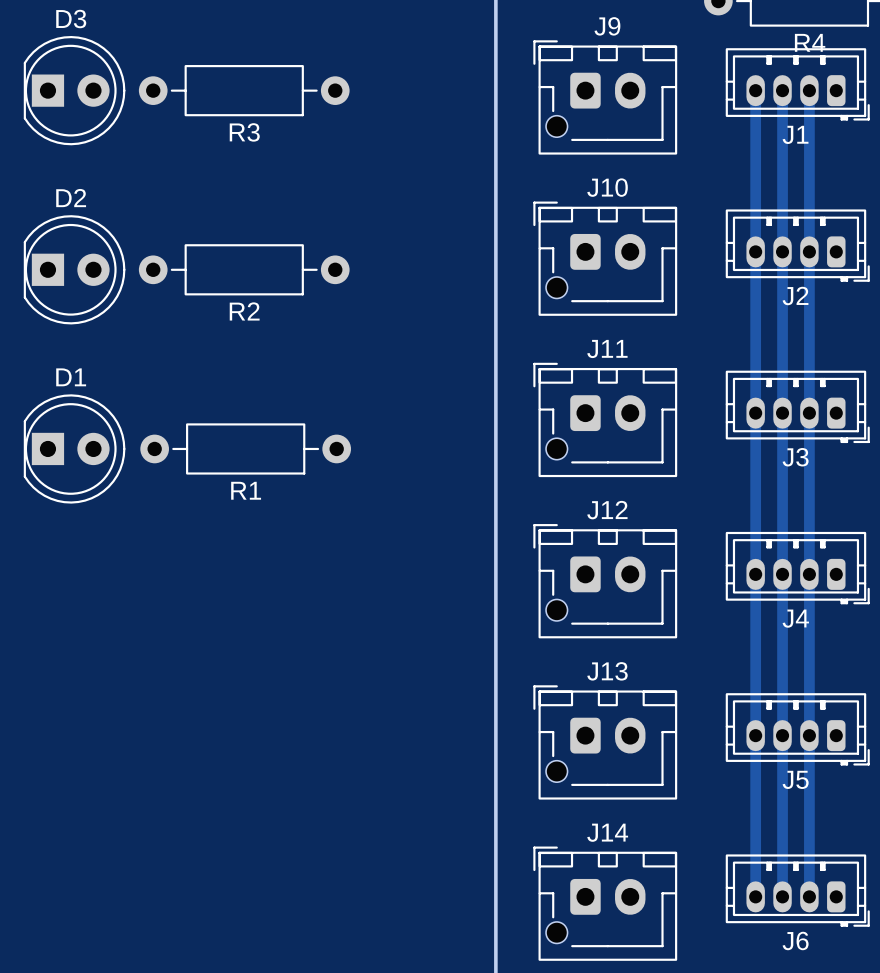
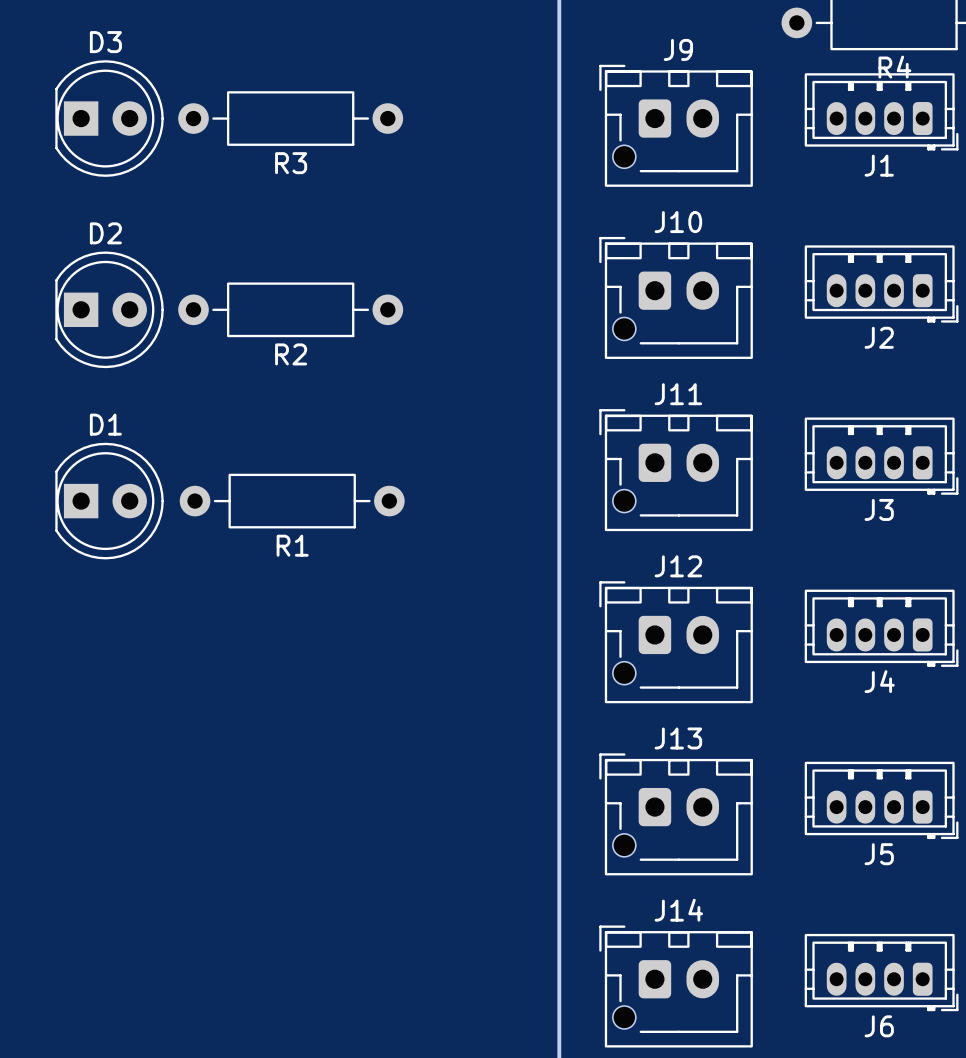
track: (755, 90) (755, 896) -> none
track: (782, 90) (782, 896) -> none
track: (809, 90) (809, 896) -> none

